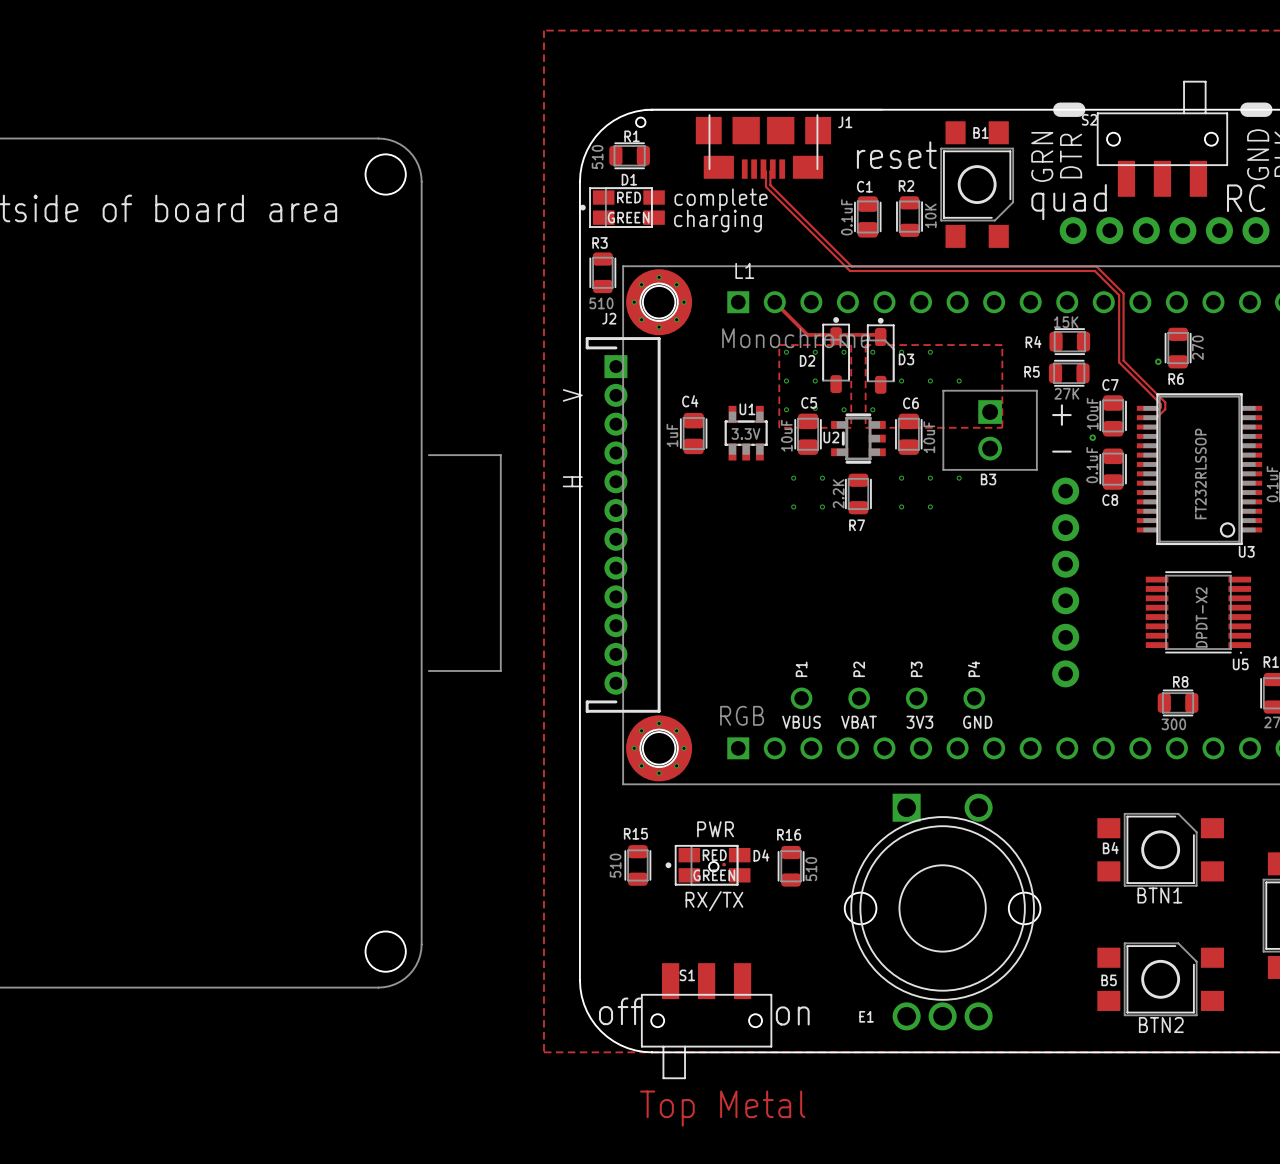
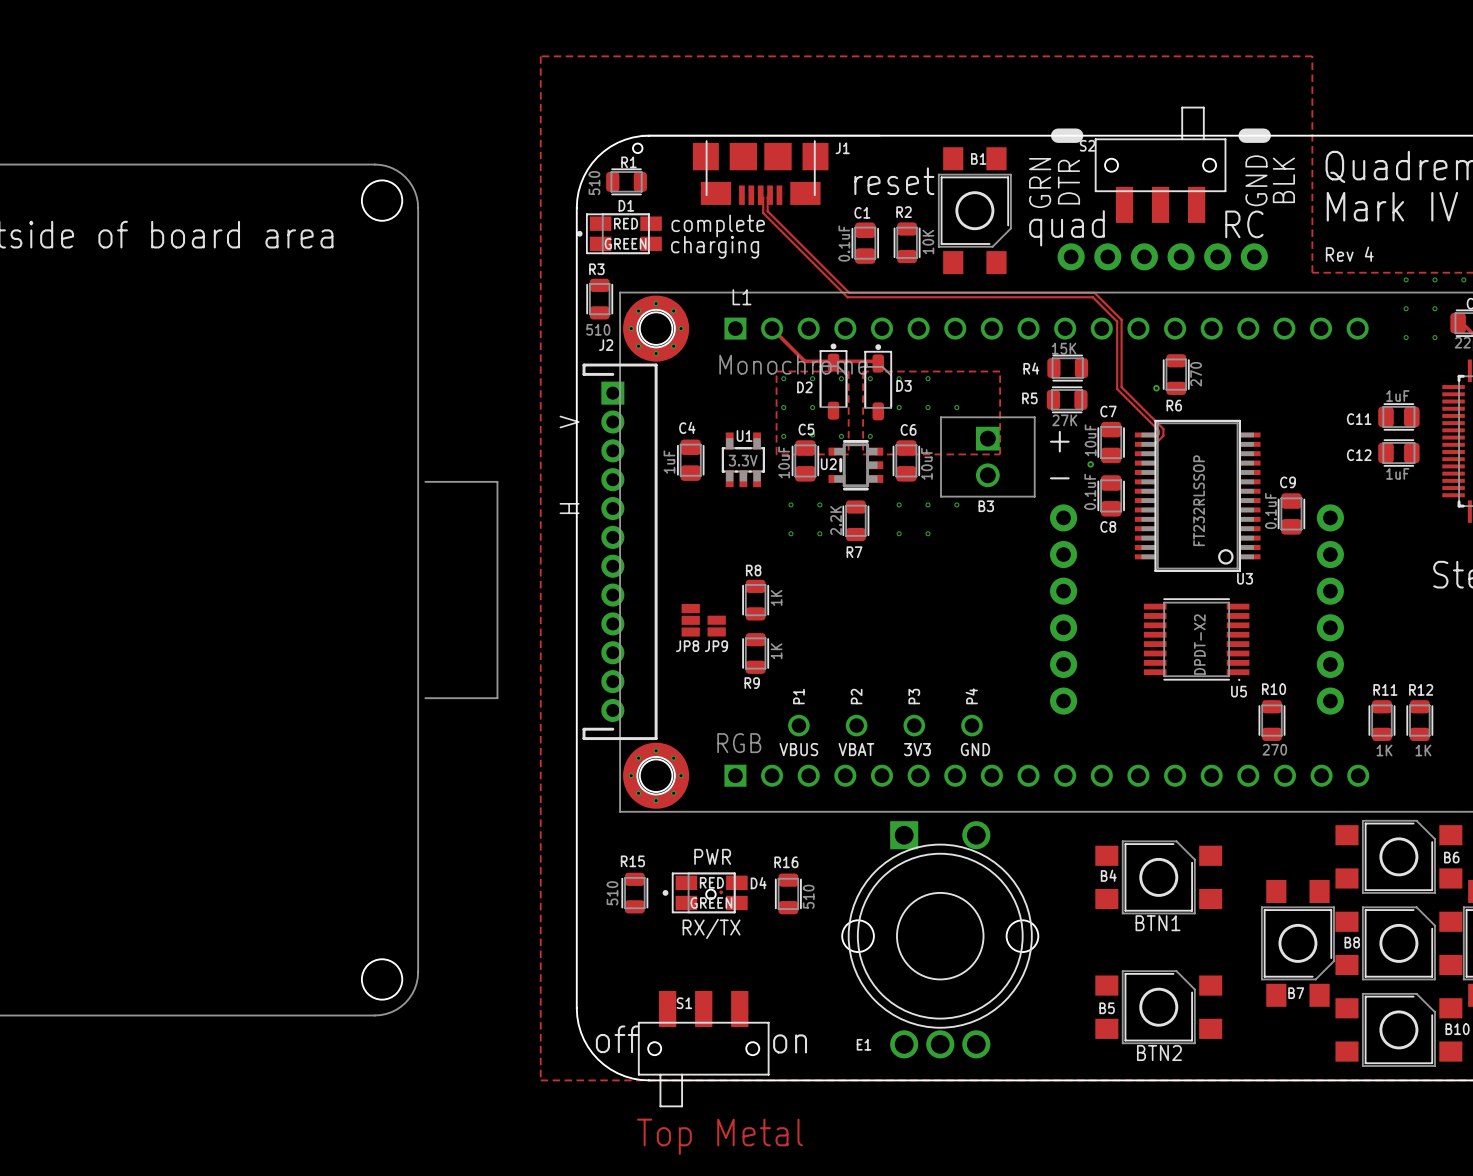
JP8: none -> (690, 620)
JP9: none -> (716, 626)
R9: none -> 1K (755, 653)
R8 rotation: 0° (1178, 702) -> 90° clockwise (755, 600)
R8 position: (1178, 702) -> (755, 600)
R8 value: 300 (1173, 724) -> 1K (776, 597)

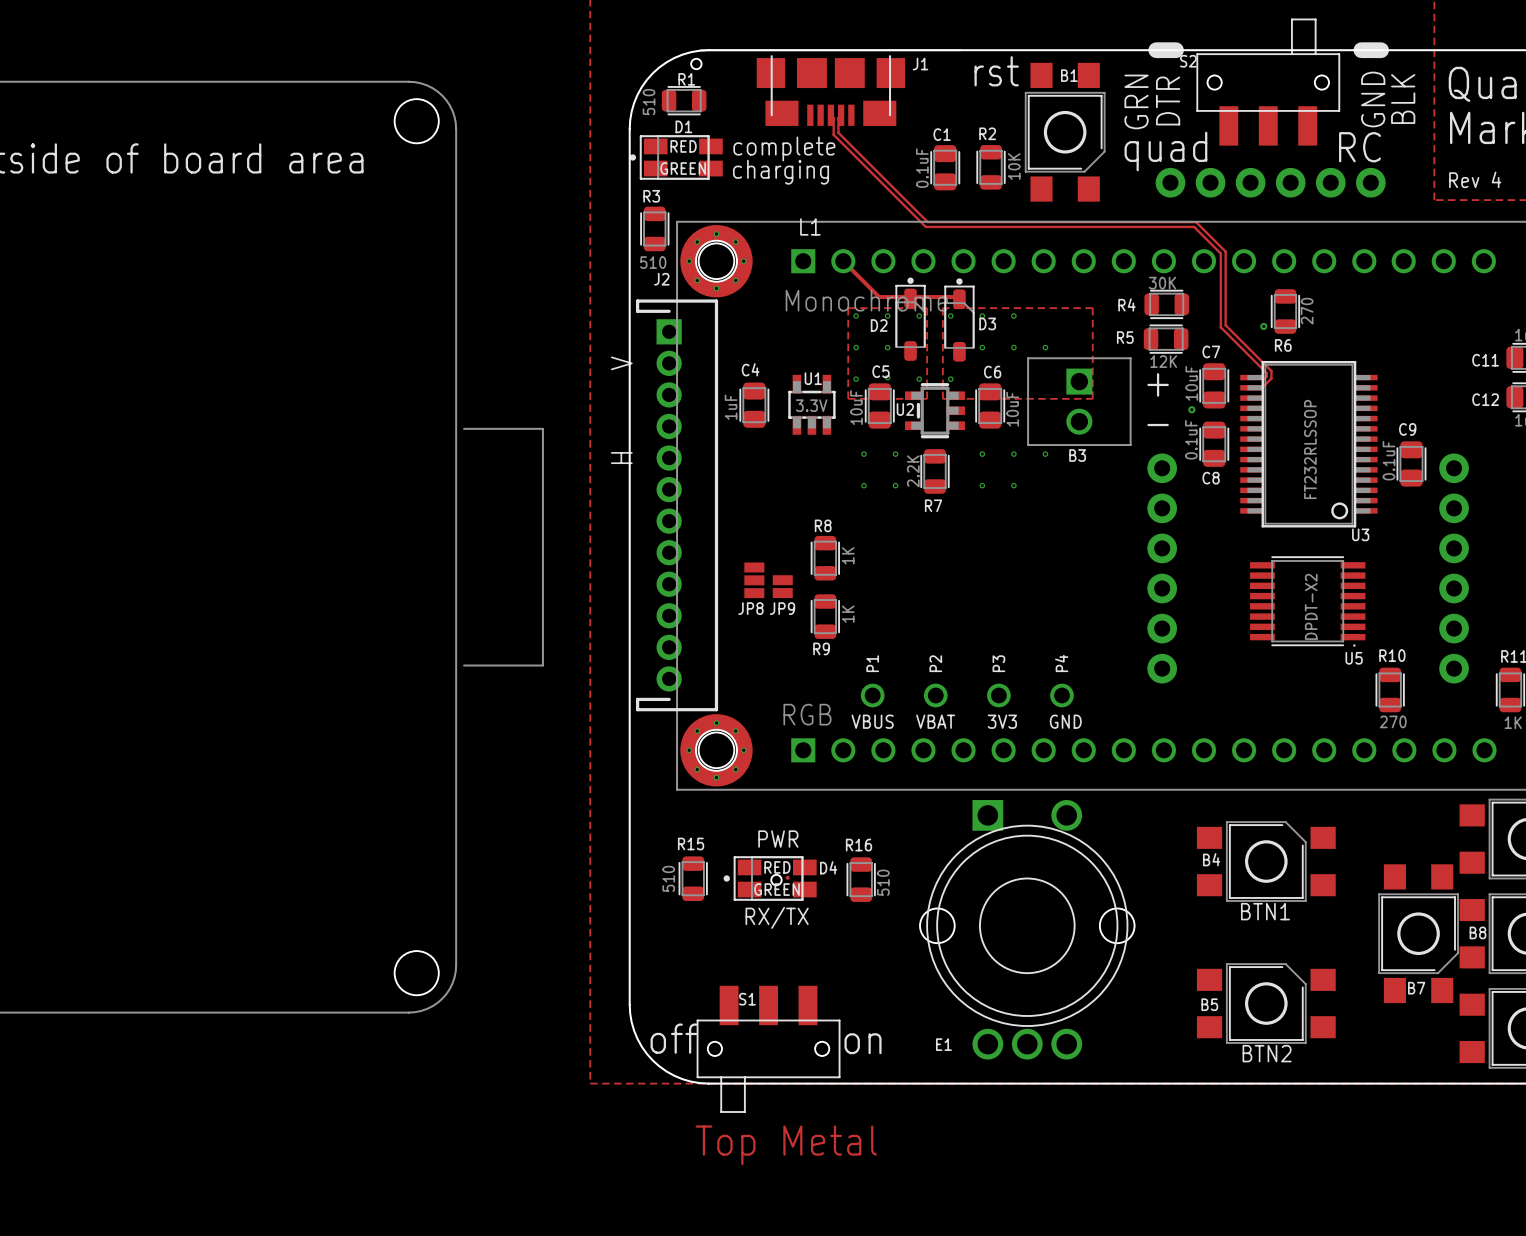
text: reset (894, 181) -> rst (996, 71)
R4 value: 15K (1064, 348) -> 30K (1162, 283)
R5 value: 27K (1064, 420) -> 12K (1163, 361)

